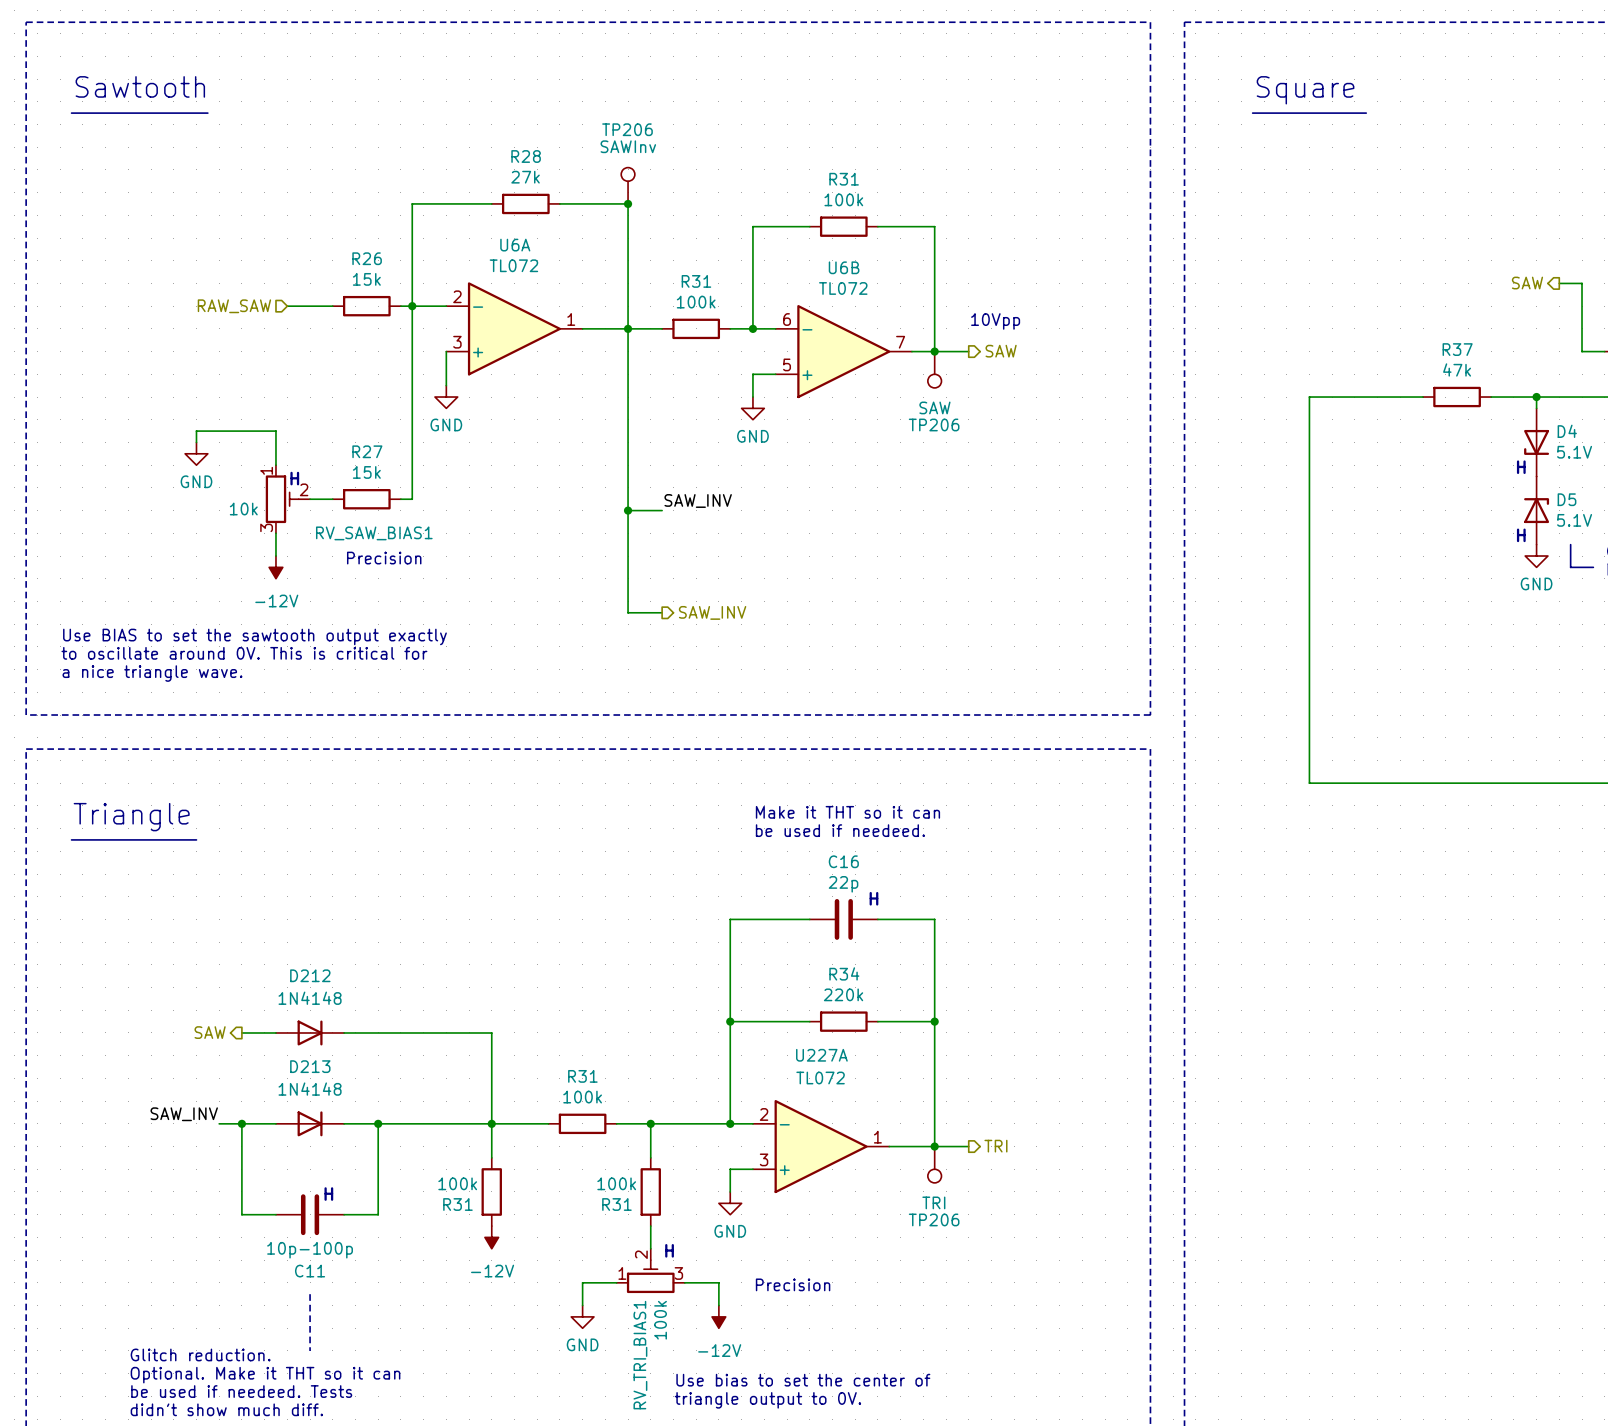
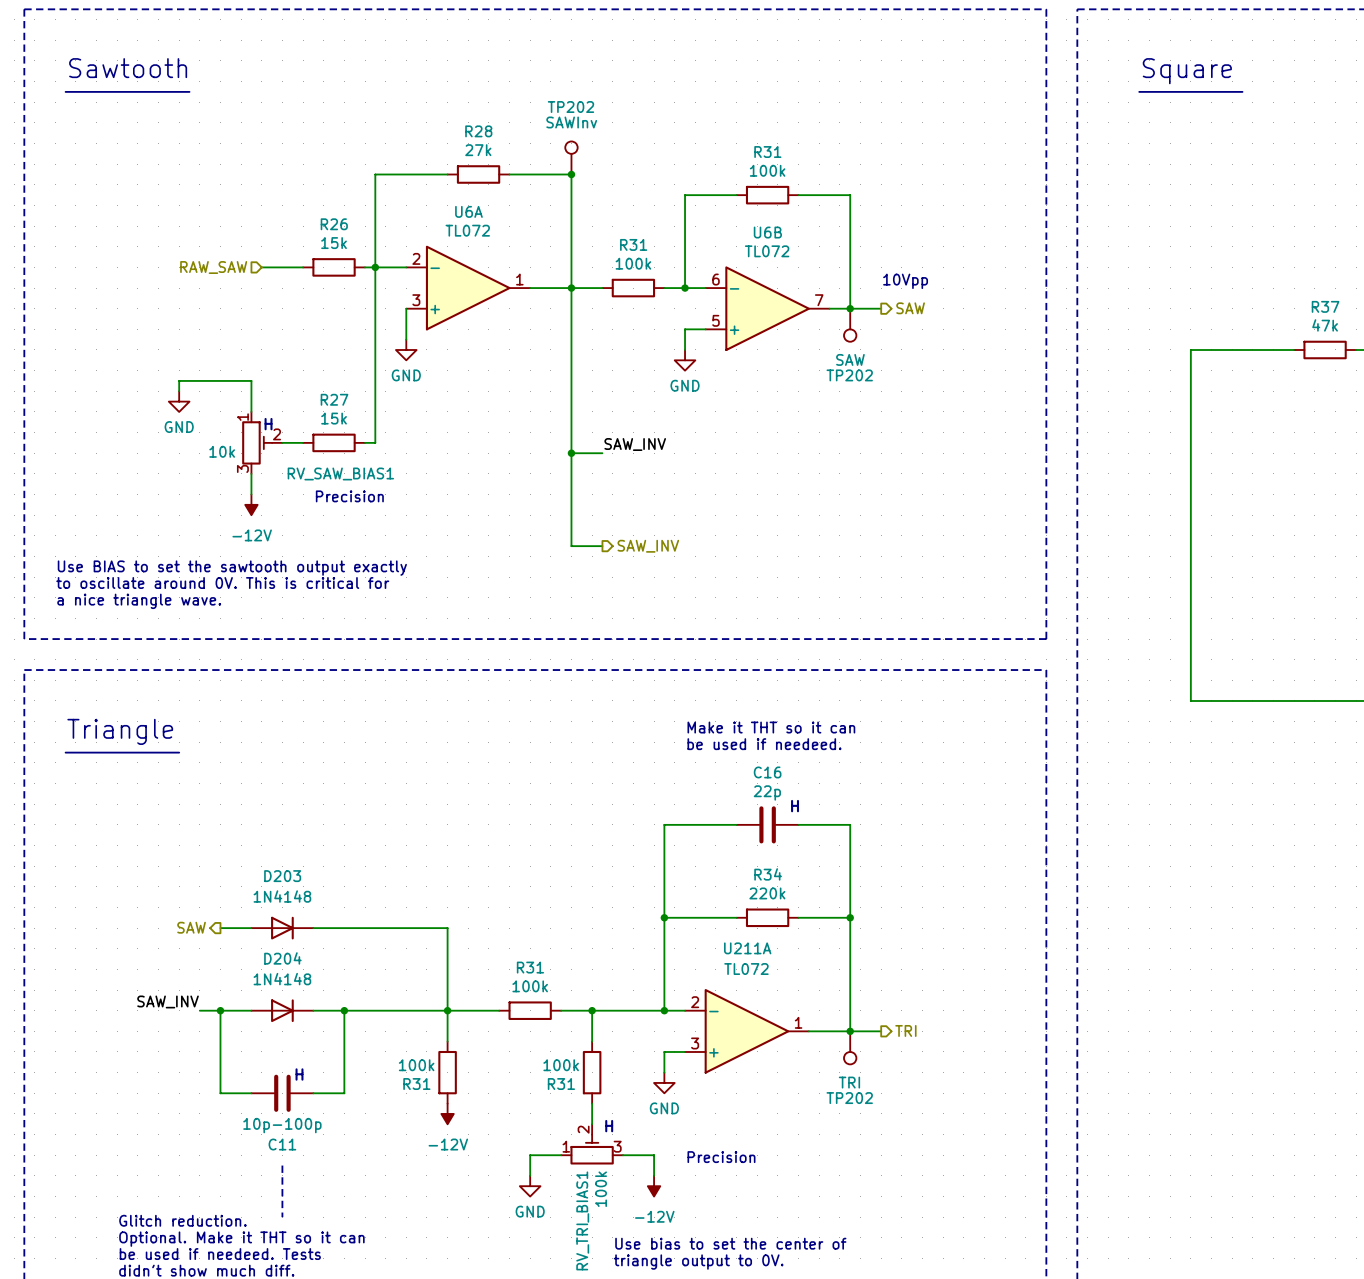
TP206 name: TP206 (627, 129) -> TP202 (570, 107)
TP206 name: TP206 (934, 424) -> TP202 (849, 375)
D212 name: D212 (310, 975) -> D203 (282, 876)
U227A name: U227A (821, 1055) -> U211A (747, 948)
D213 name: D213 (310, 1066) -> D204 (282, 958)
TP206 name: TP206 (934, 1219) -> TP202 (849, 1098)

